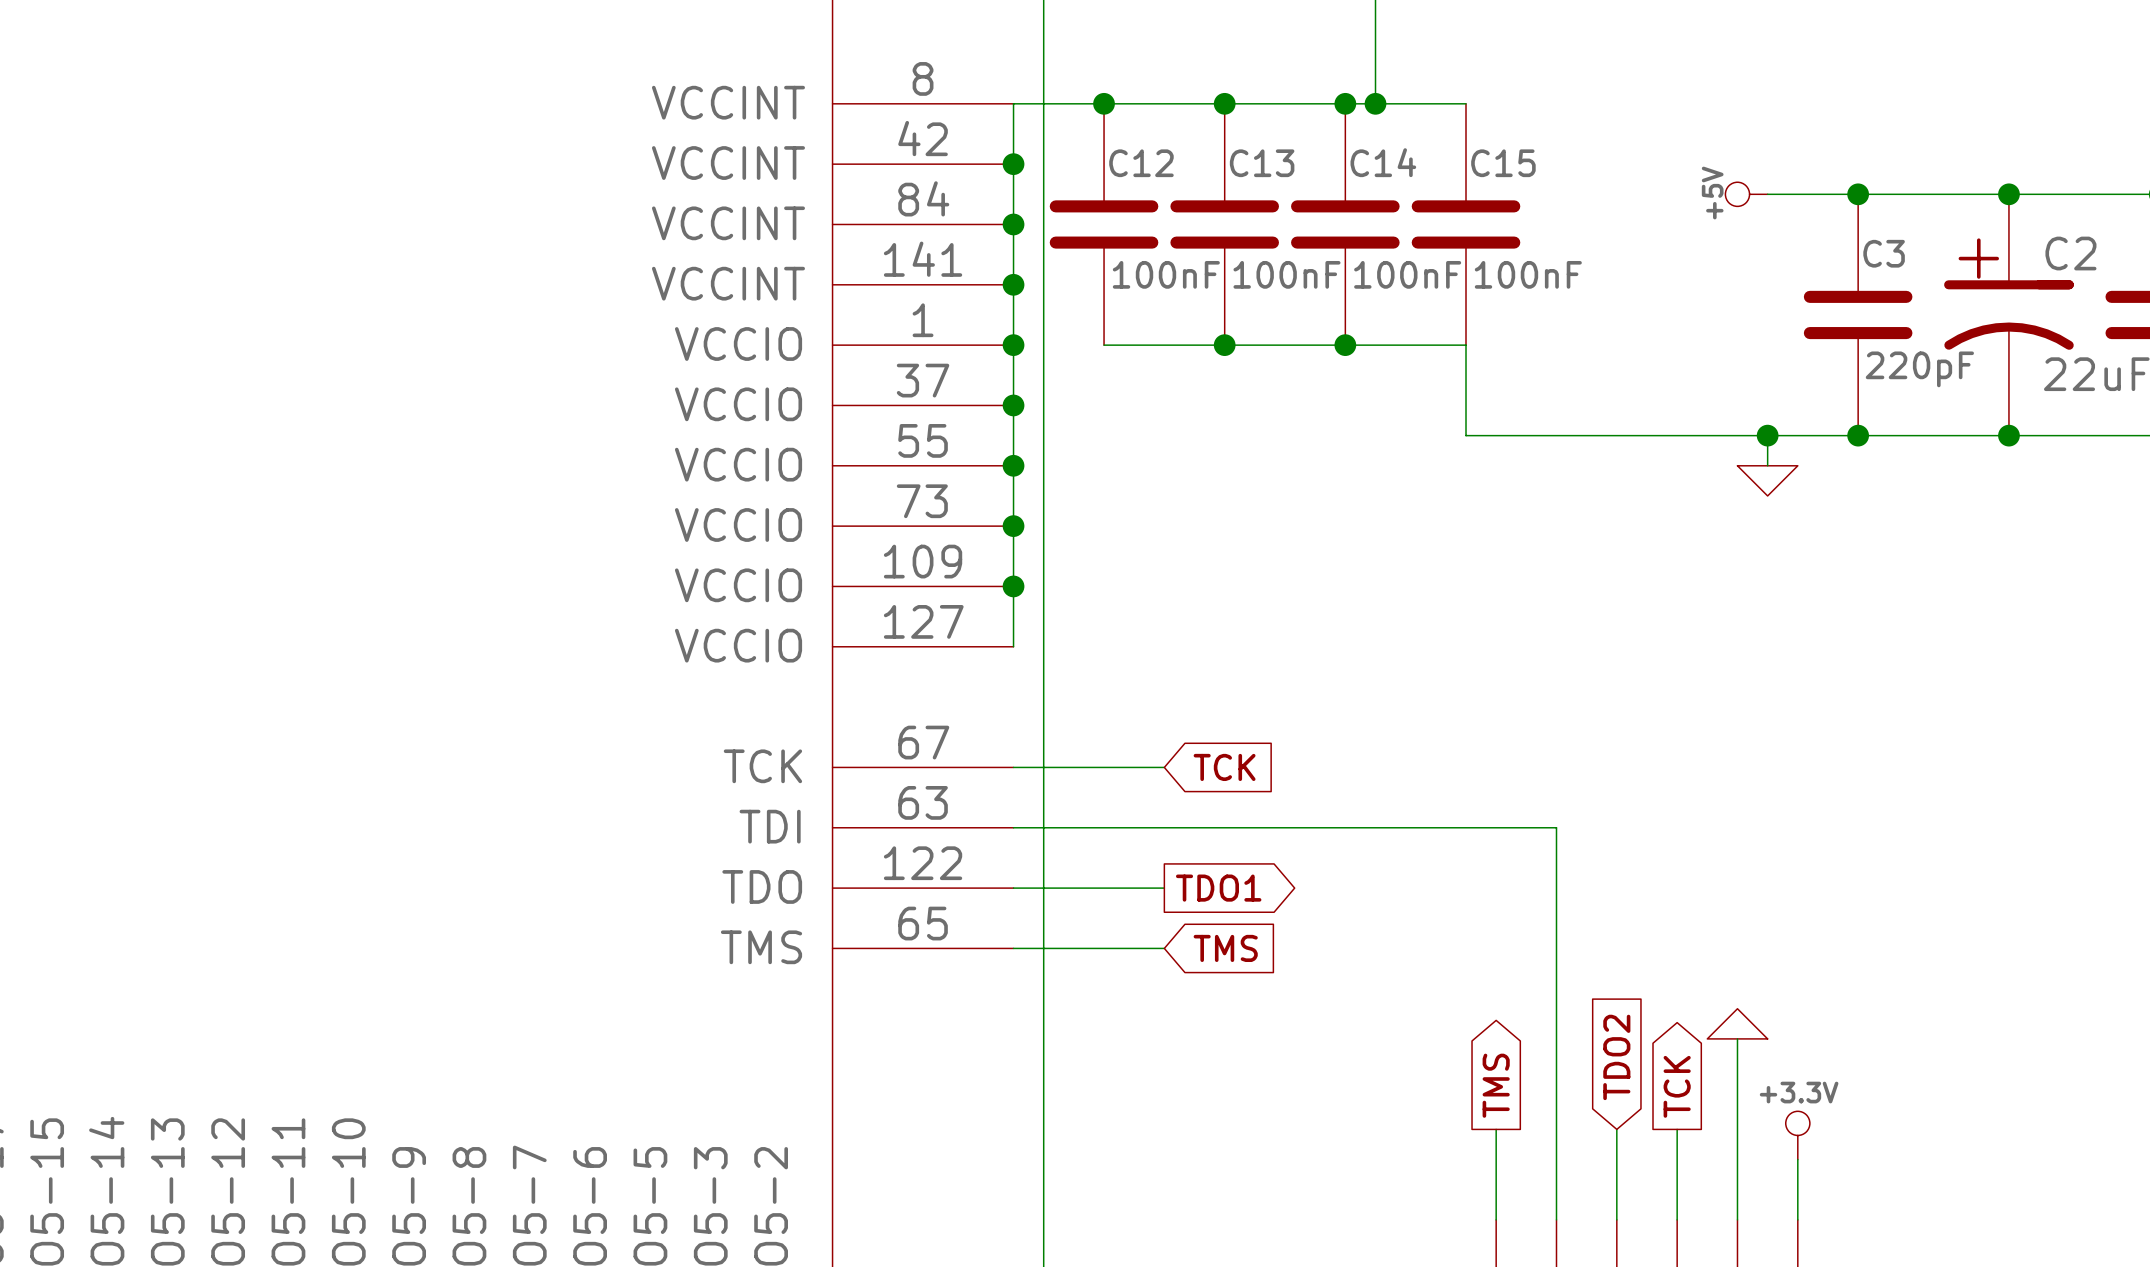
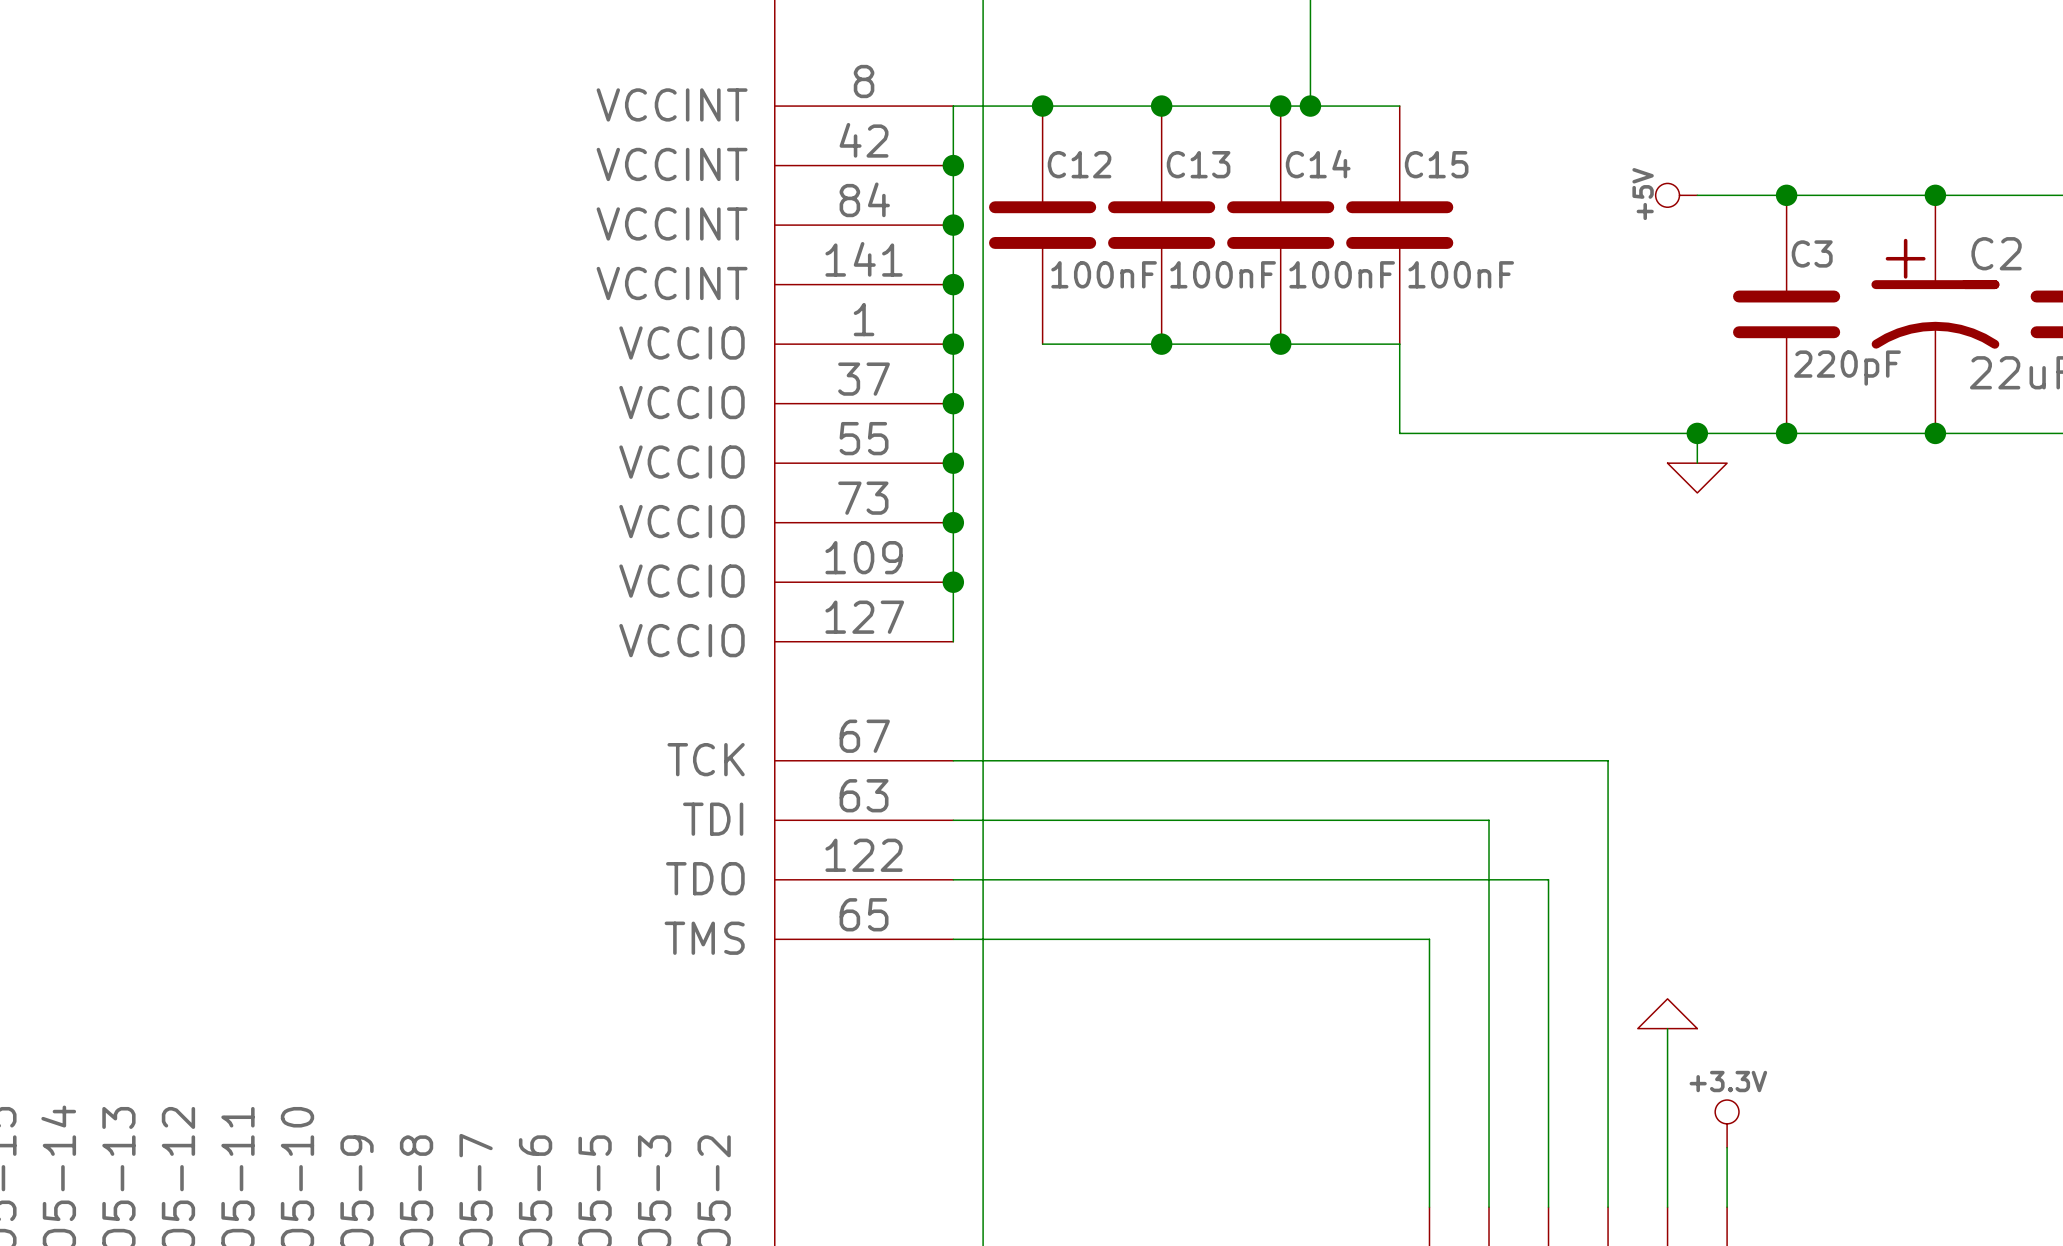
wire: none -> (1102, 760) (1608, 760) (1608, 1117)
global label: TCK (1224, 767) -> none
wire: none -> (1102, 879) (1548, 879) (1548, 1117)
global label: TDO1 (1218, 888) -> none
wire: none -> (1102, 939) (1429, 939) (1429, 1117)
global label: TMS (1225, 948) -> none
global label: TDO2 (1616, 1057) -> none
global label: TMS (1496, 1085) -> none
global label: TCK (1677, 1086) -> none

